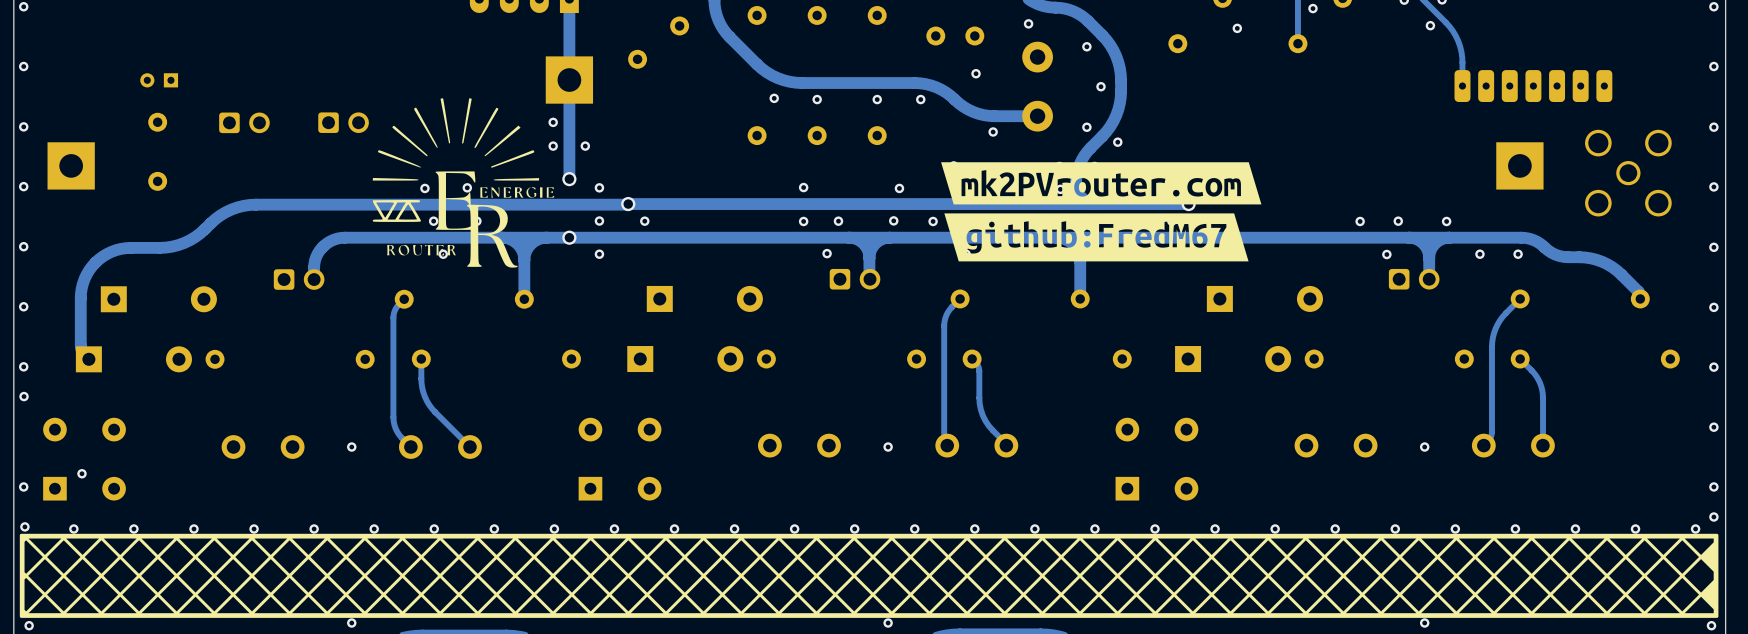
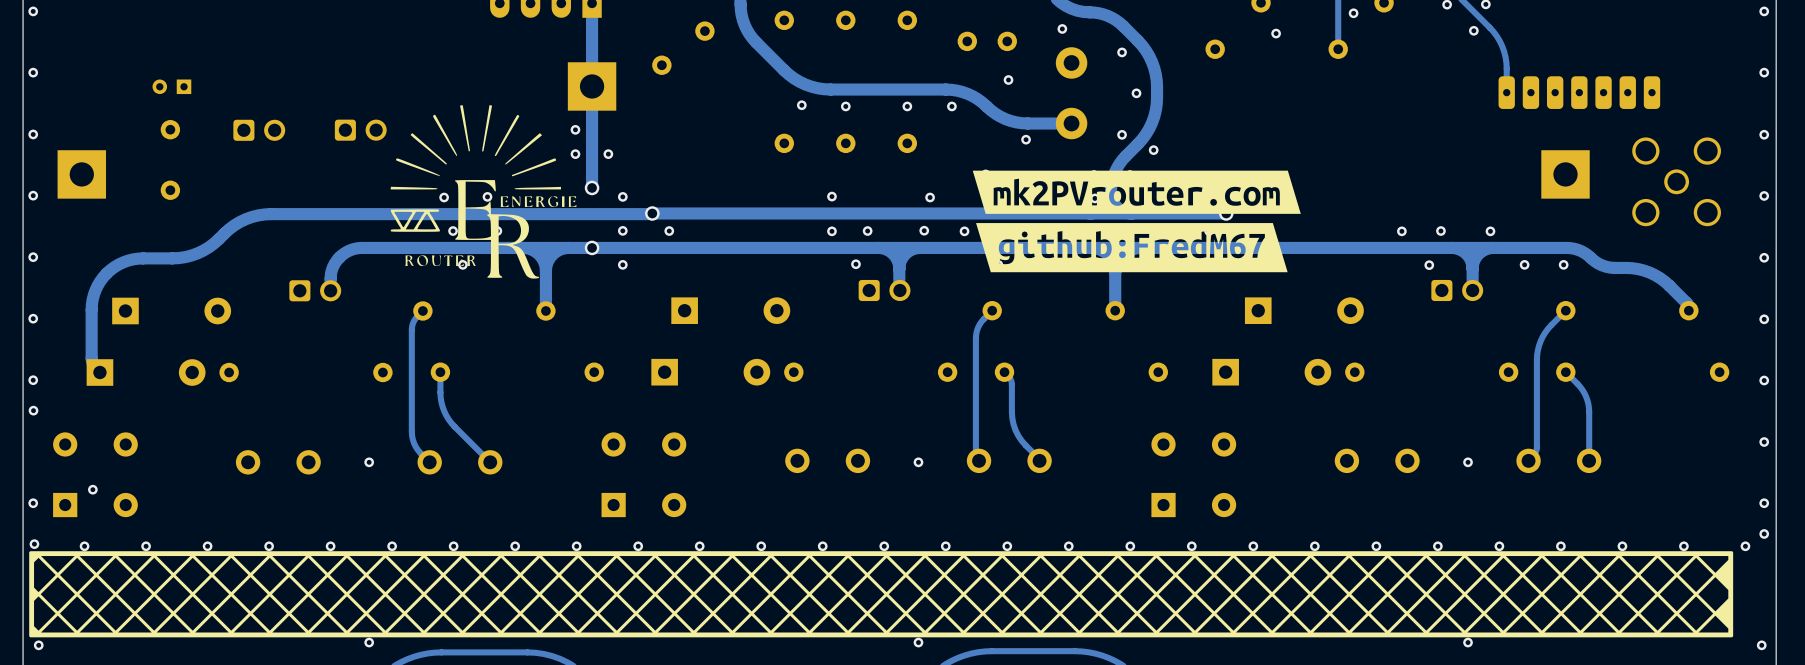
drawing: [19, 533, 1719, 618] -> none
drawing: none -> [29, 551, 1734, 638]

